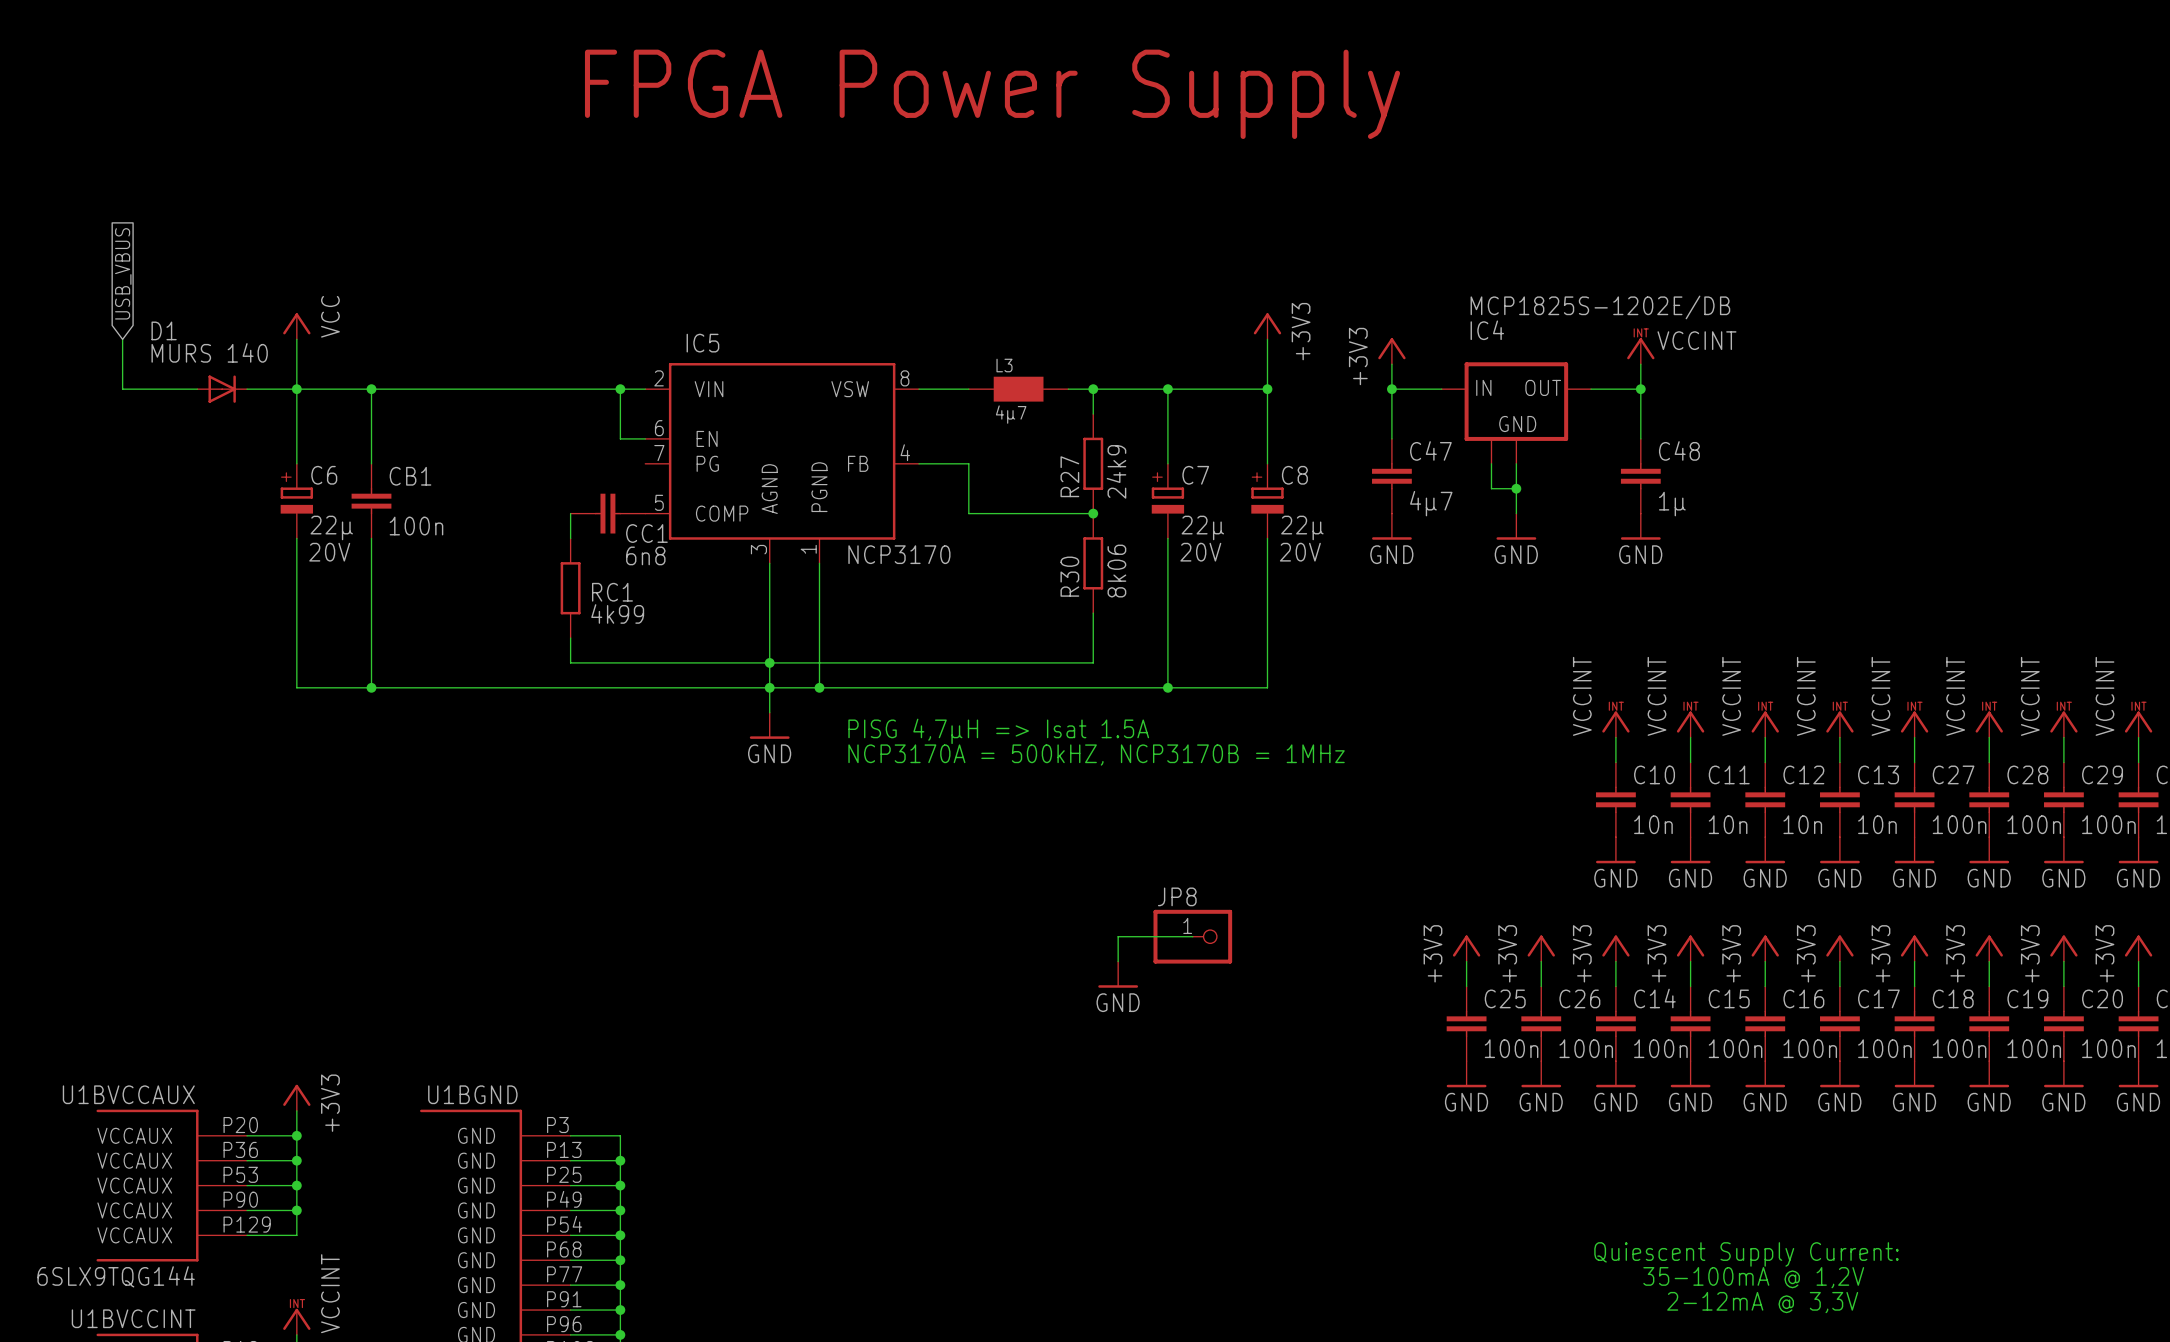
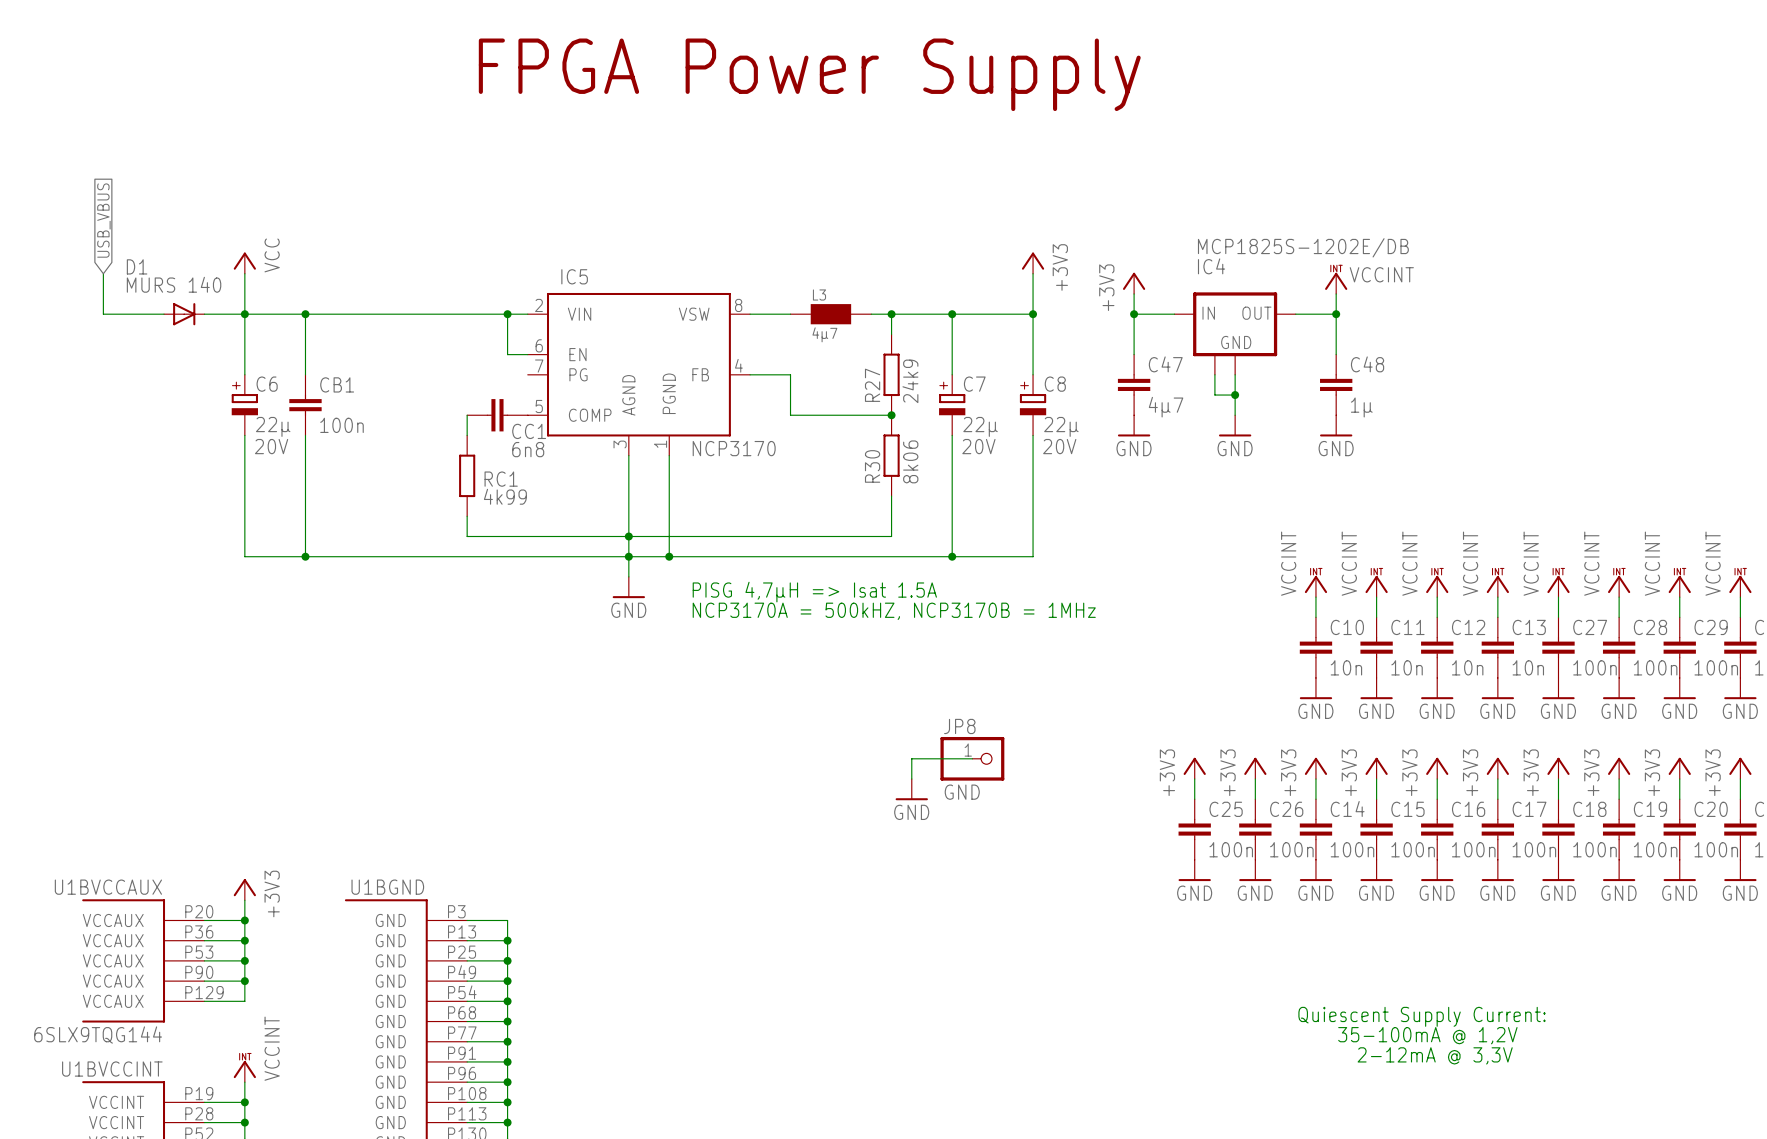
JP8 value: none -> GND (962, 792)

